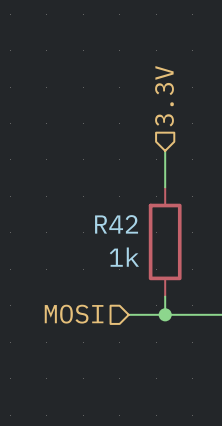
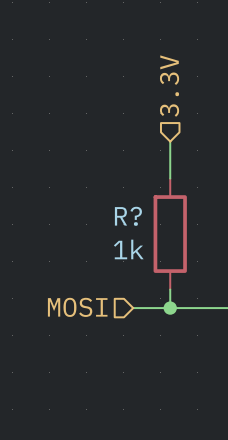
R42 name: R42 (116, 224) -> R? (128, 216)

